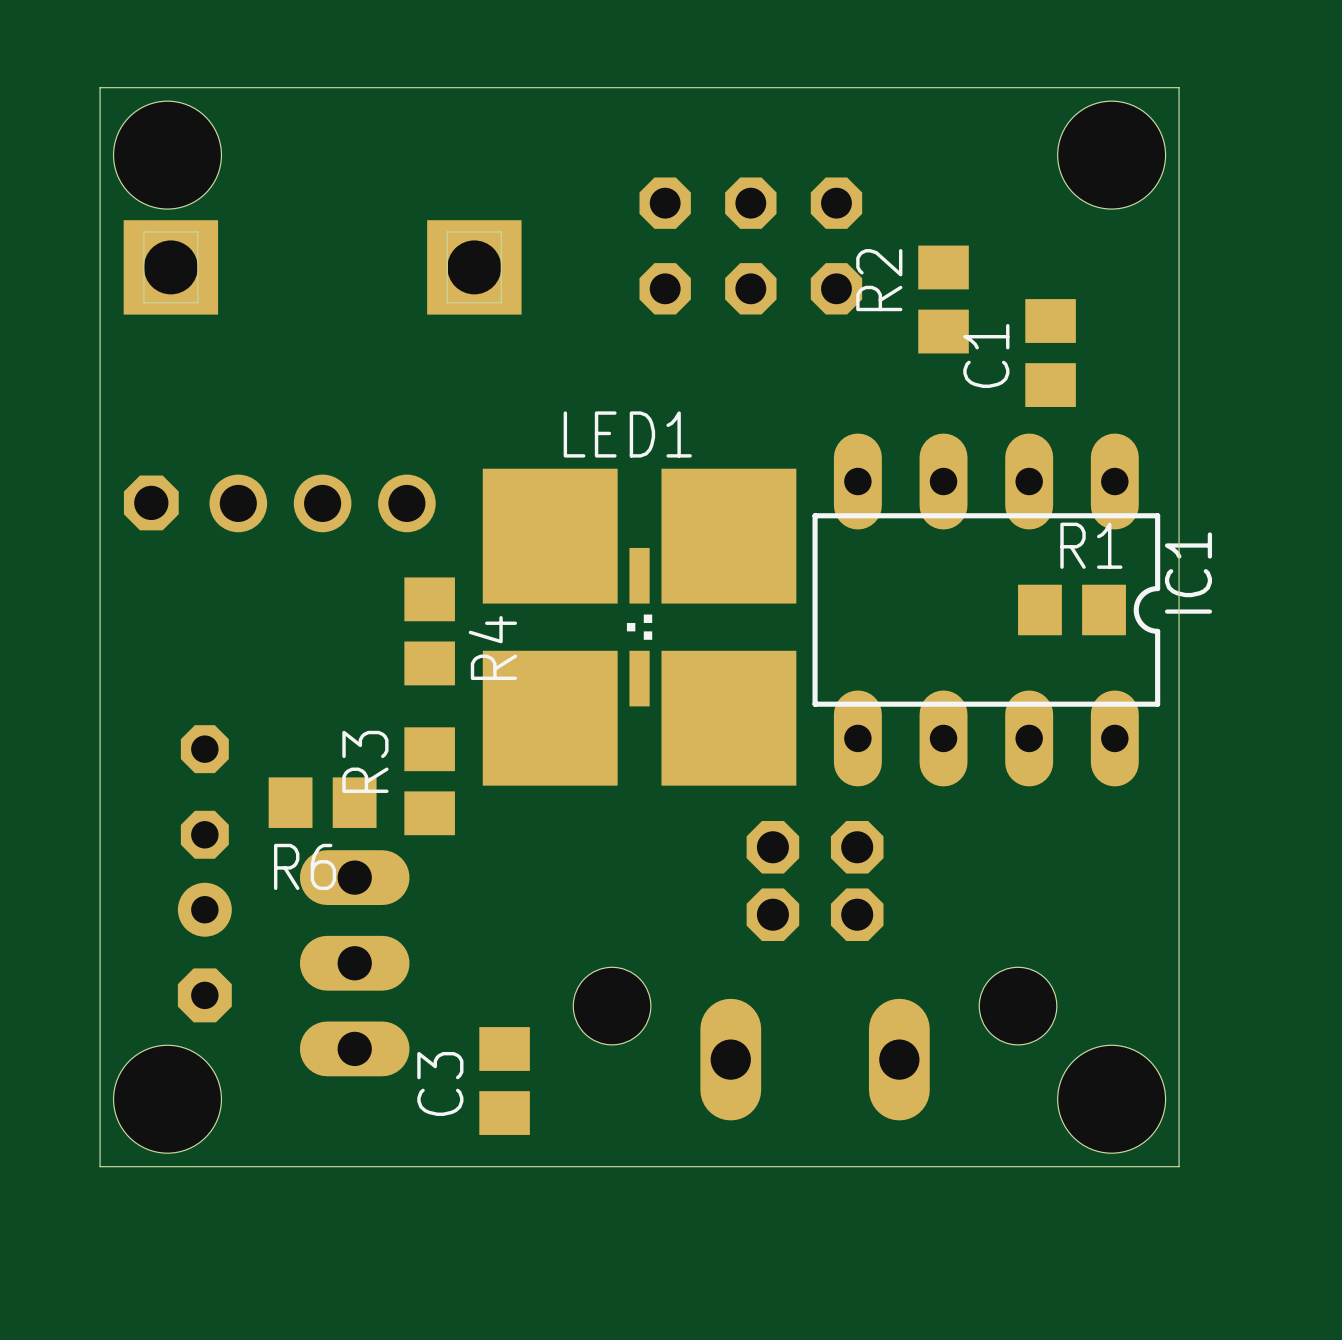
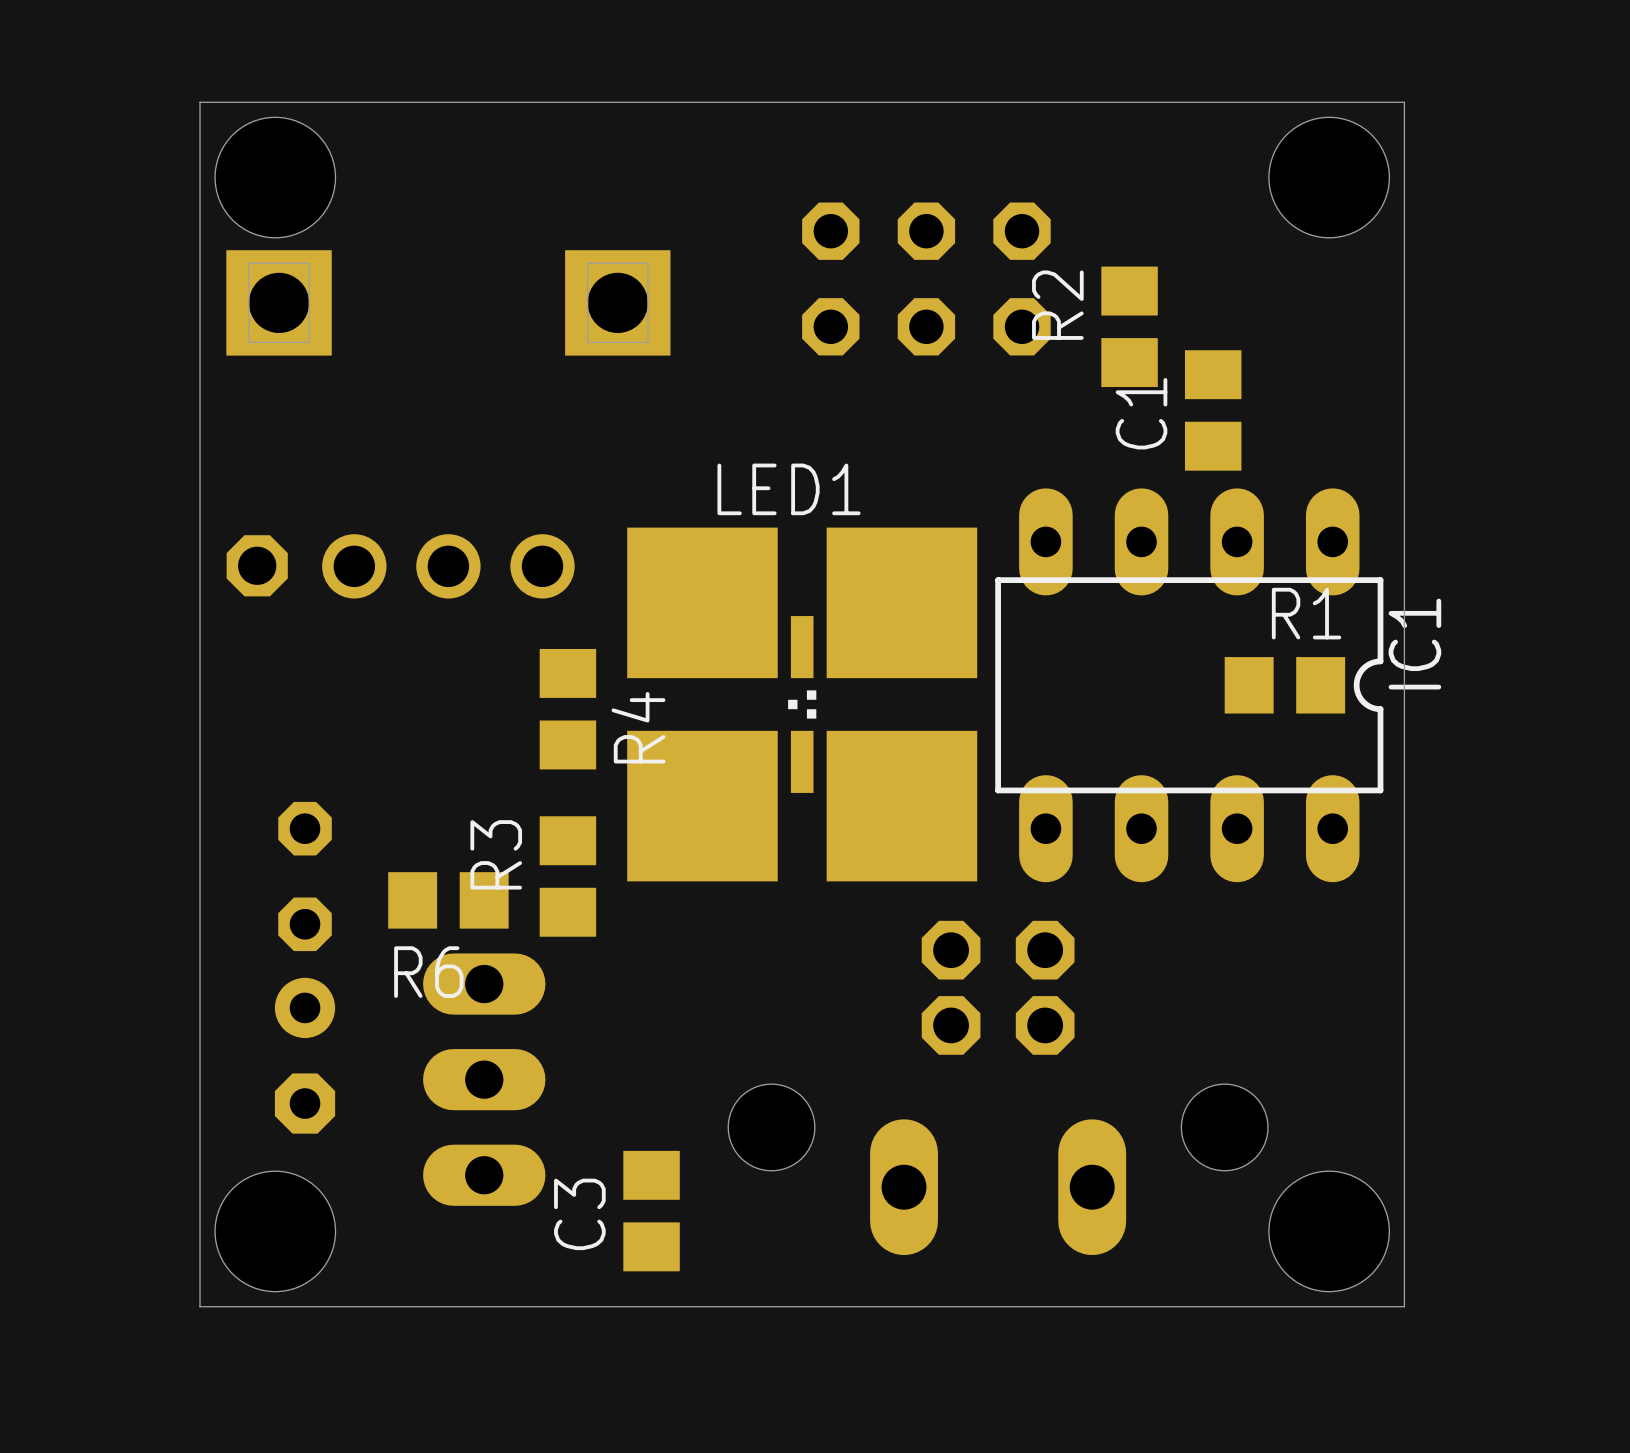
R2 position: (943, 299) -> (1129, 326)
C1 position: (1050, 353) -> (1213, 410)
part position: (204, 791) -> (305, 876)
part position: (204, 952) -> (305, 1055)

